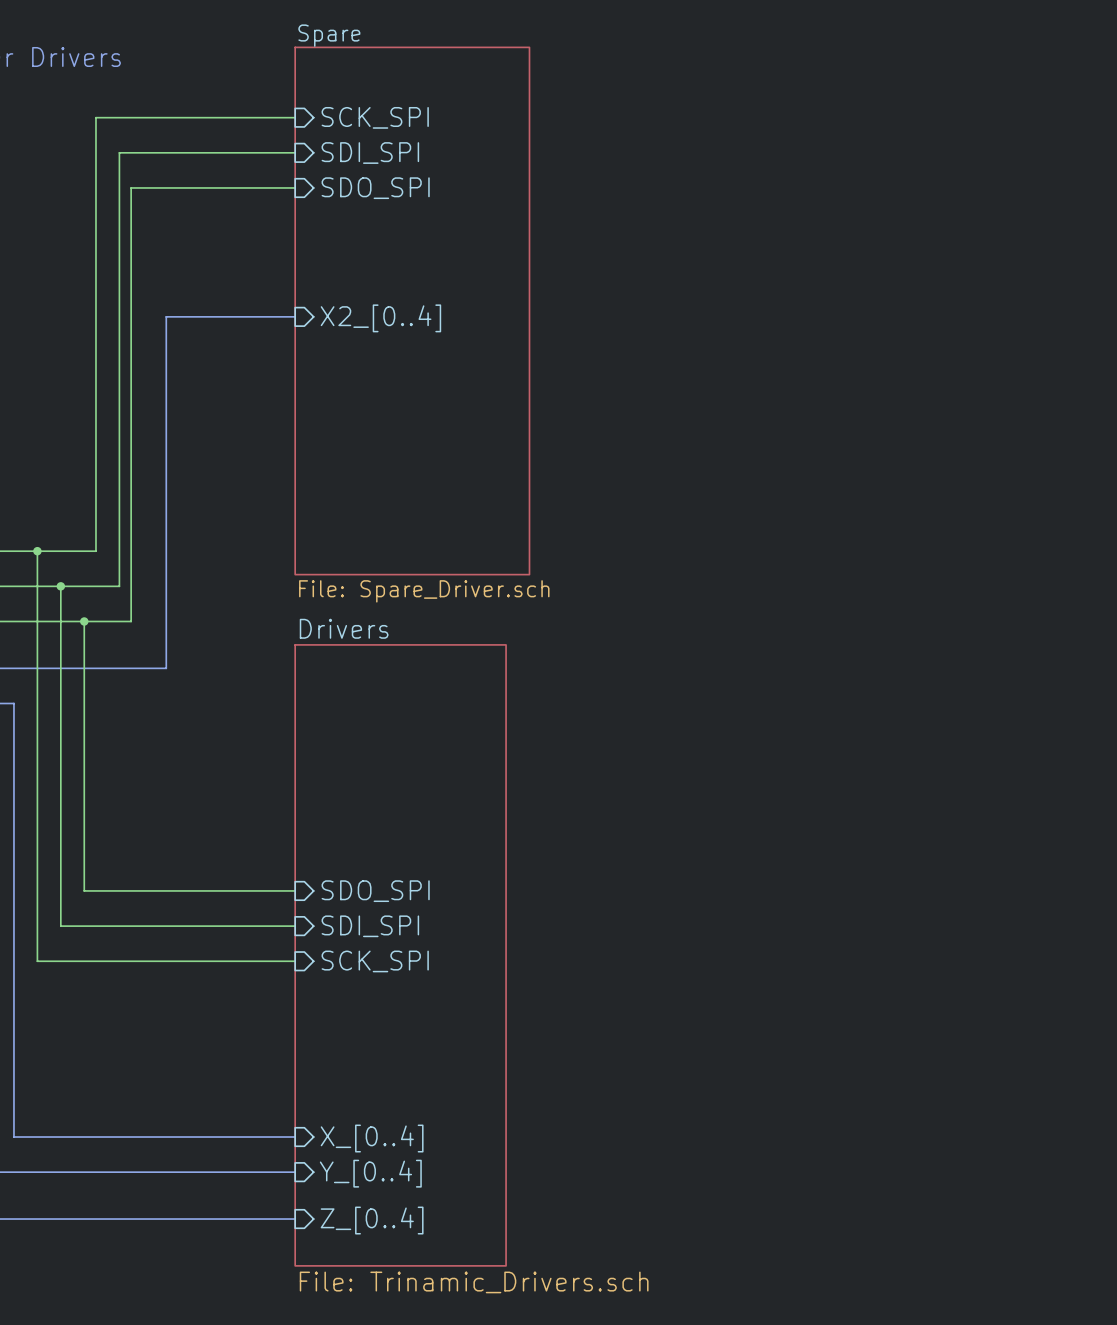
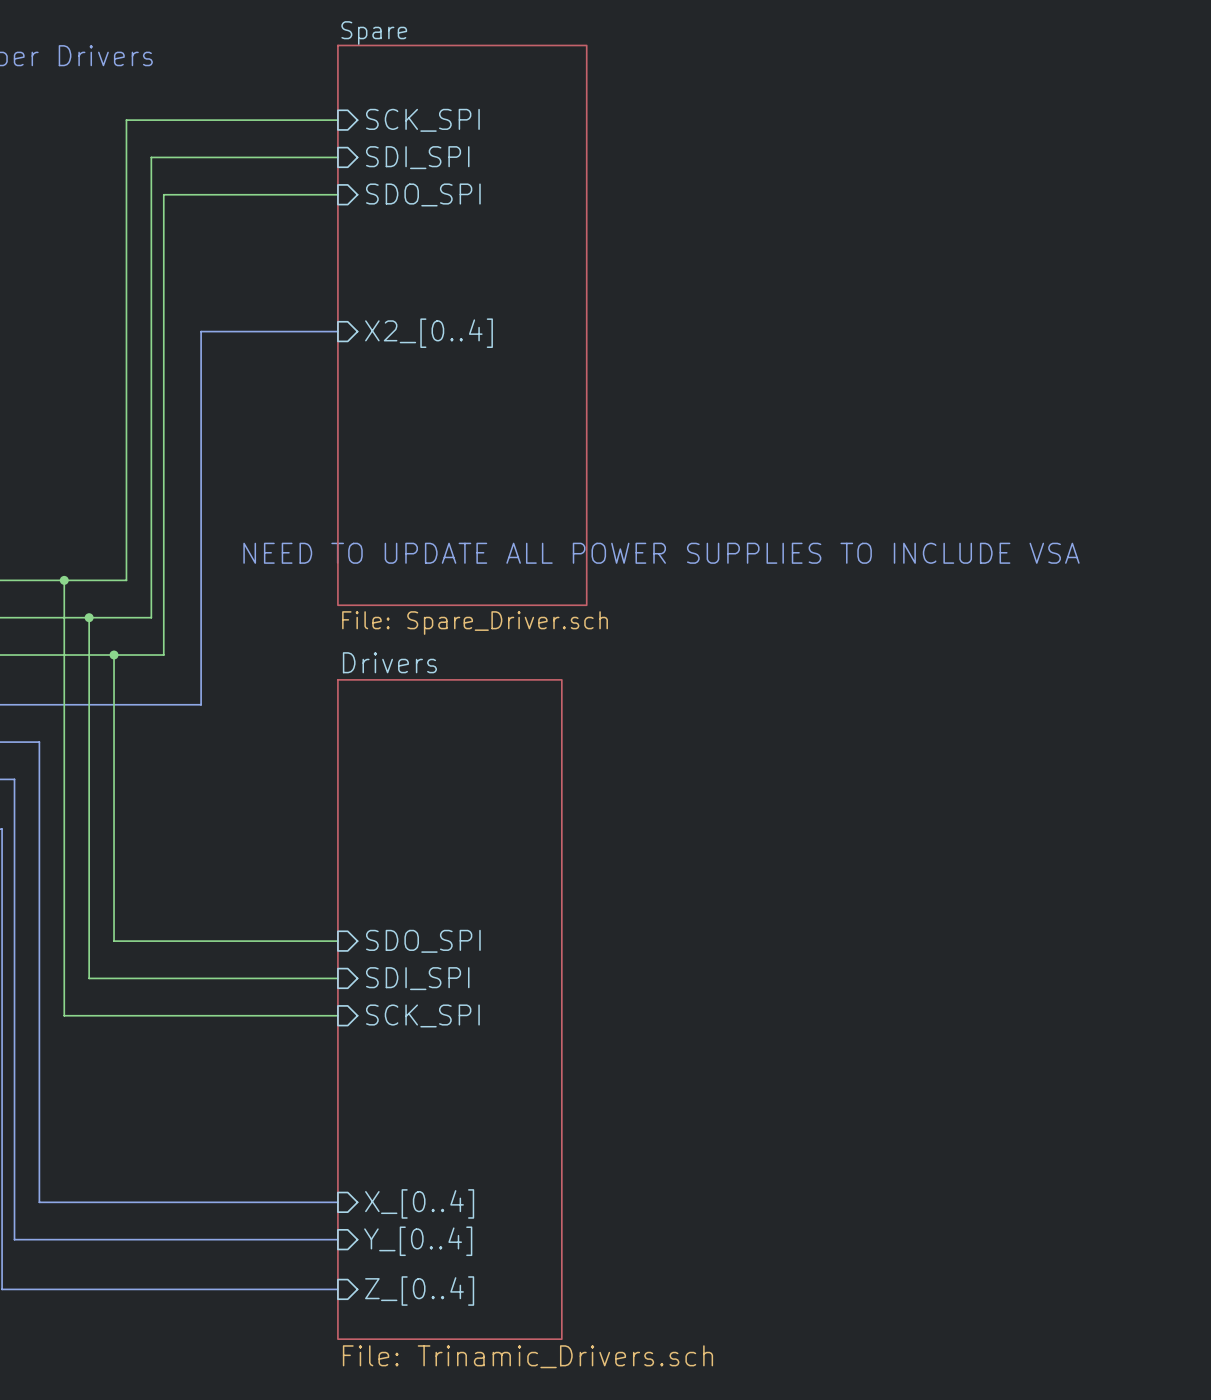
text: none -> NEED TO UPDATE ALL POWER SUPPLIES TO INCLUDE VSA (661, 553)

